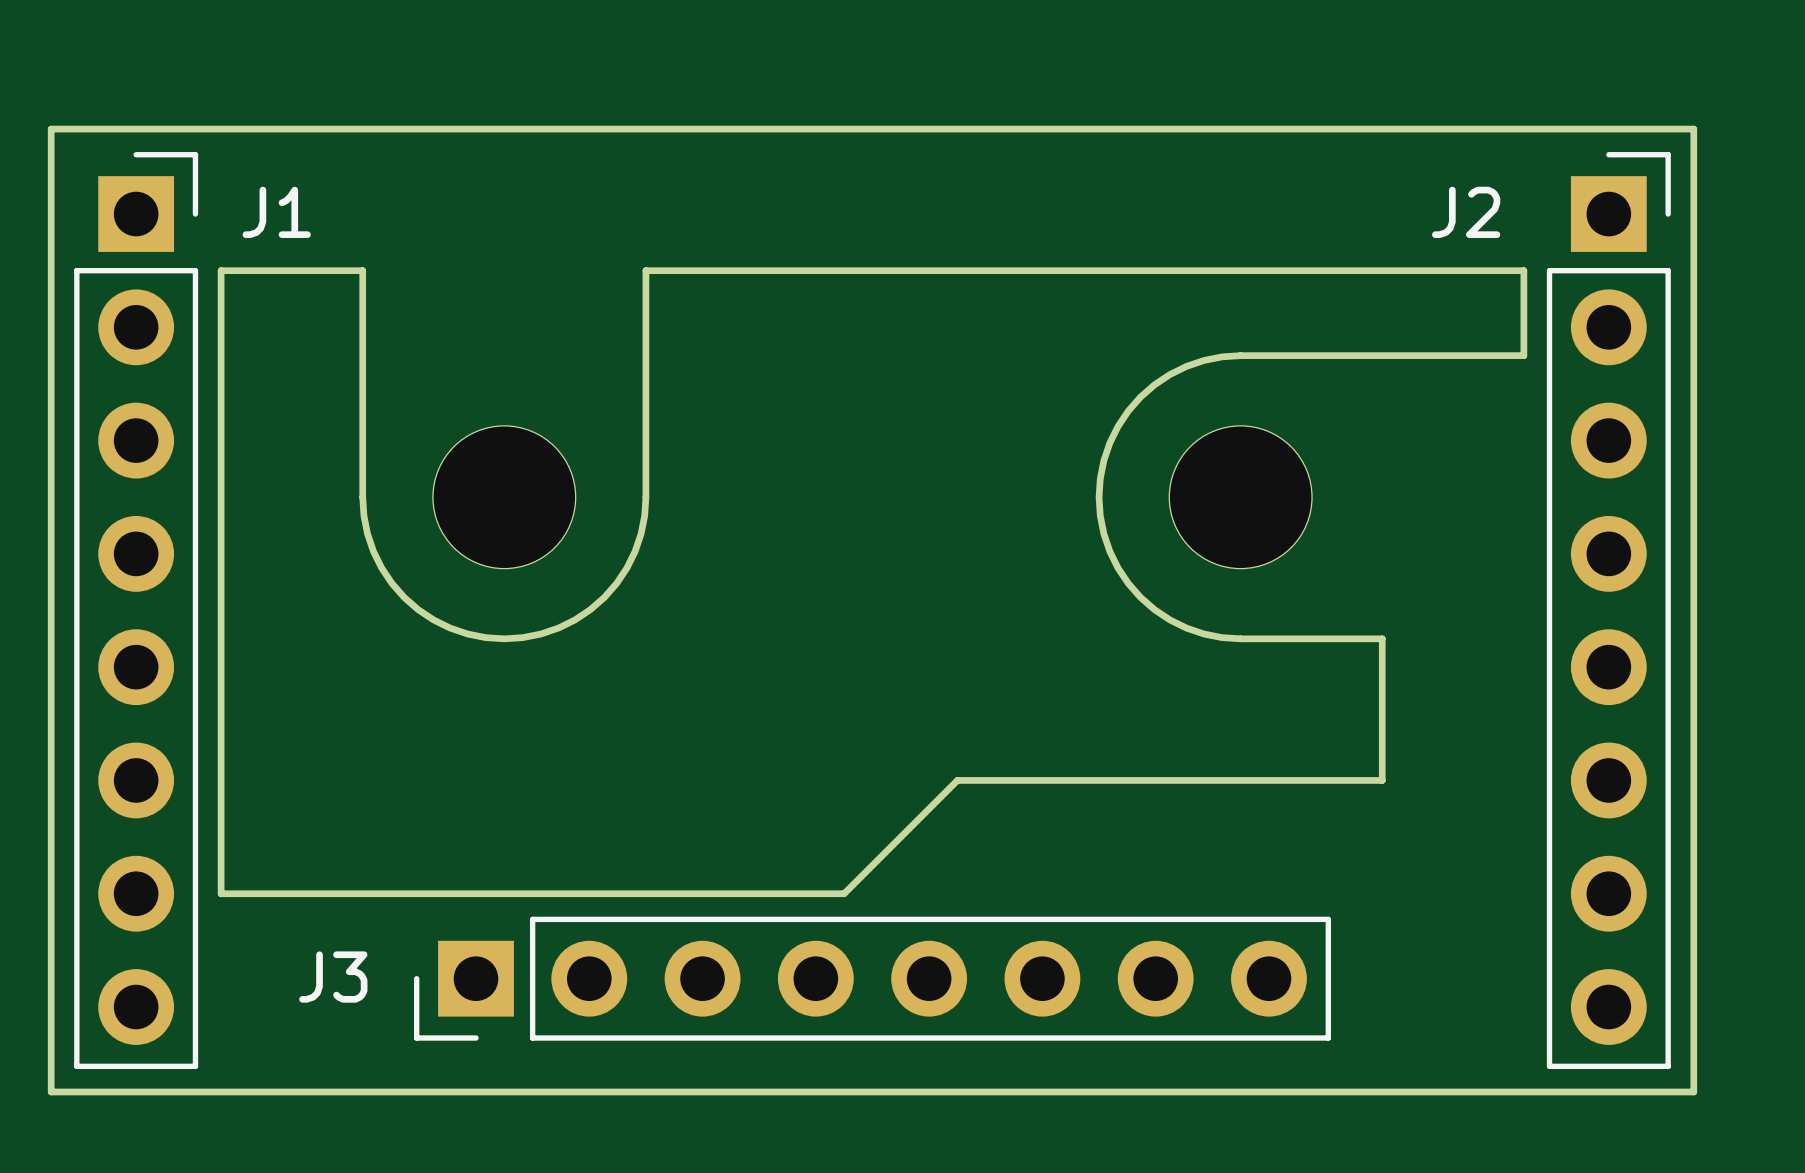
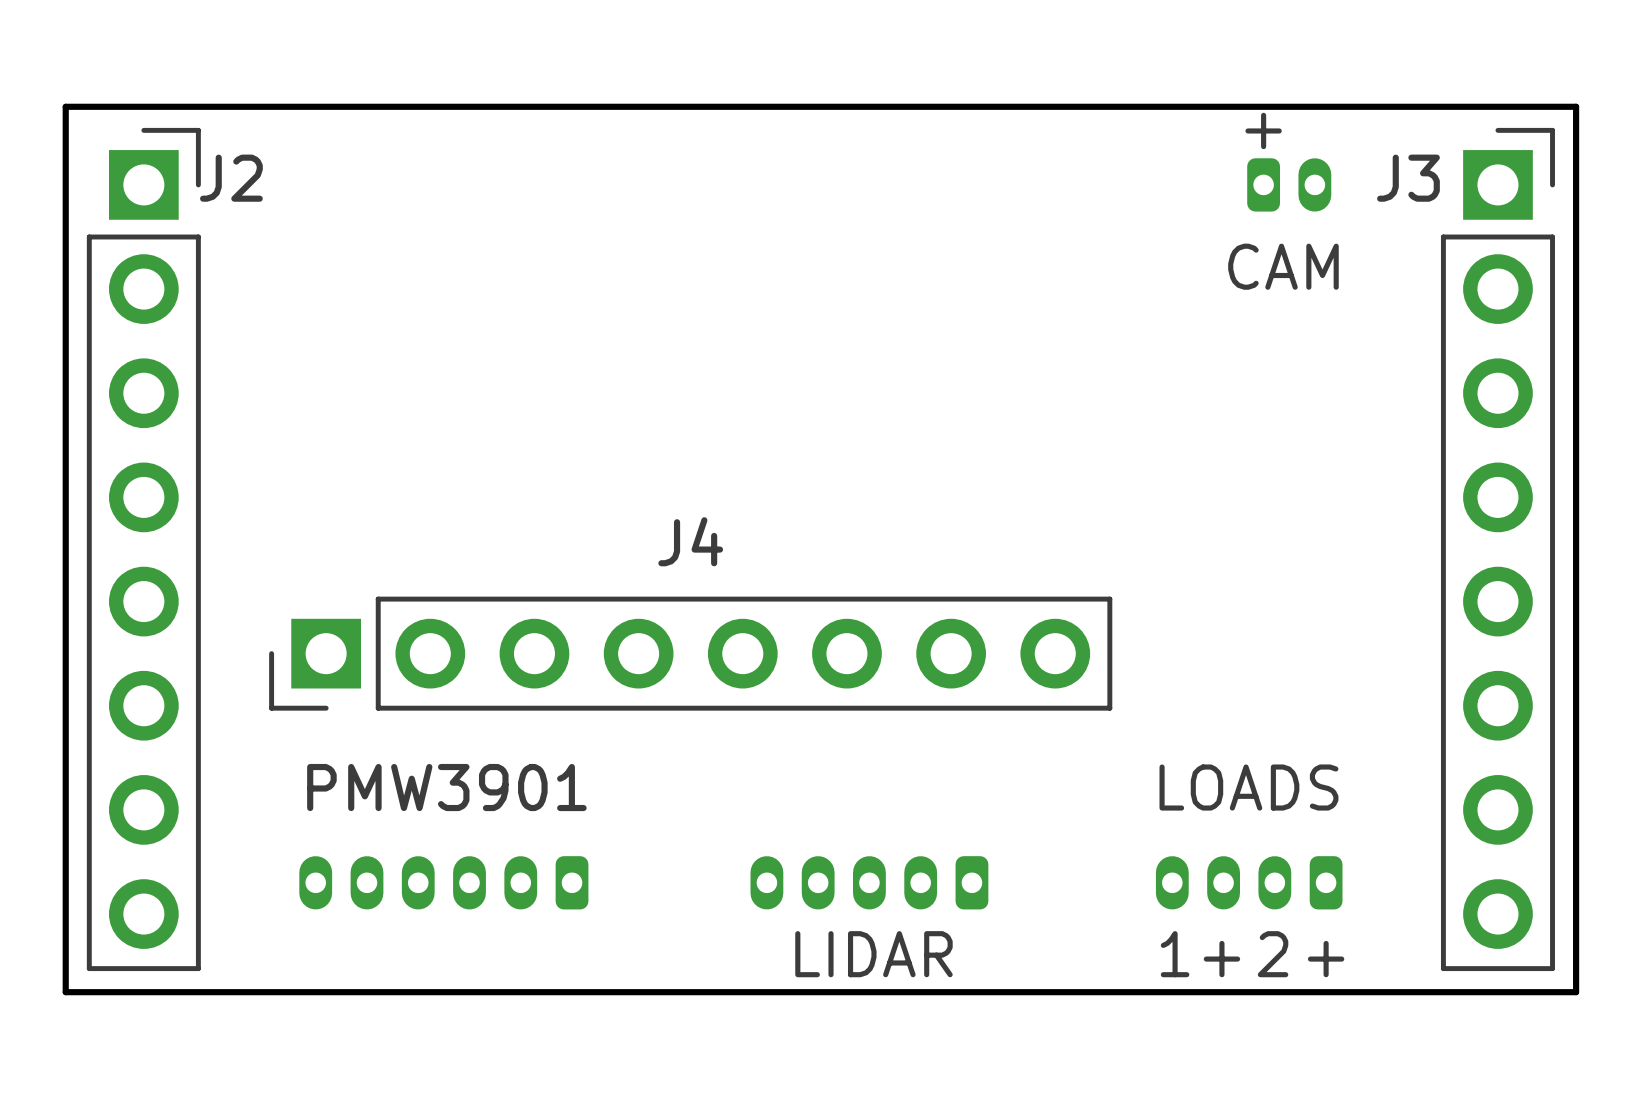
text: none -> + (1263, 130)
J1 name: J1 (276, 212) -> J2 (231, 178)
J2 name: J2 (1466, 212) -> J3 (1408, 178)
part: none -> (1289, 184)
text: none -> CAM (1283, 266)
part: (504, 497) -> none
board edge: (645, 497) (641, 533) (626, 568) (604, 597) (575, 619) (540, 634) (504, 638) (467, 634) (433, 619) (404, 597) (391, 583) (381, 568) (367, 533) (362, 497) (362, 270) (221, 270) (221, 893) (844, 893) (957, 780) (1382, 780) (1382, 638) (1222, 637) (1186, 628) (1169, 619) (1140, 597) (1128, 583) (1109, 551) (1100, 515) (1100, 478) (1103, 460) (1118, 426) (1140, 397) (1169, 374) (1204, 360) (1240, 355) (1523, 355) (1523, 270) (645, 270) (645, 497) -> none
part: (1240, 497) -> none
J4: none -> (690, 653)
text: none -> PMW3901 (446, 787)
text: none -> LOADS (1248, 787)
part: none -> (443, 882)
part: none -> (869, 882)
part: none -> (1249, 882)
J3: (872, 978) -> none
text: none -> LIDAR (873, 954)
text: none -> 1 (1175, 954)
text: none -> 2 (1273, 954)
text: none -> + (1221, 959)
text: none -> + (1326, 959)

